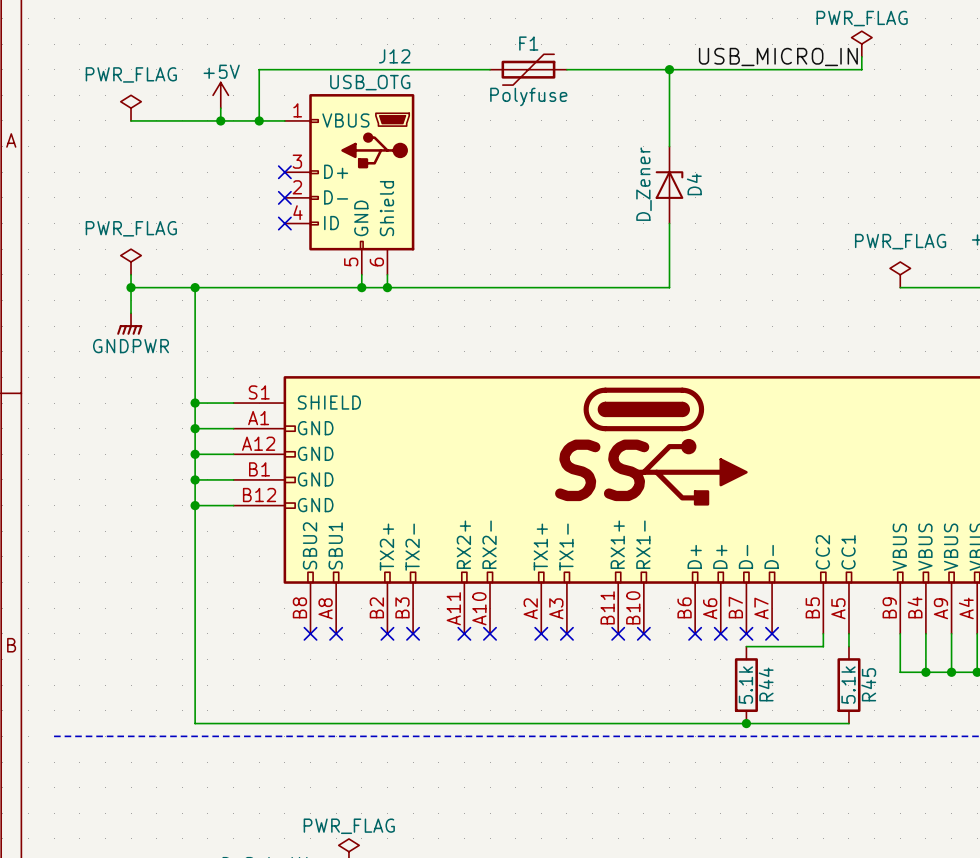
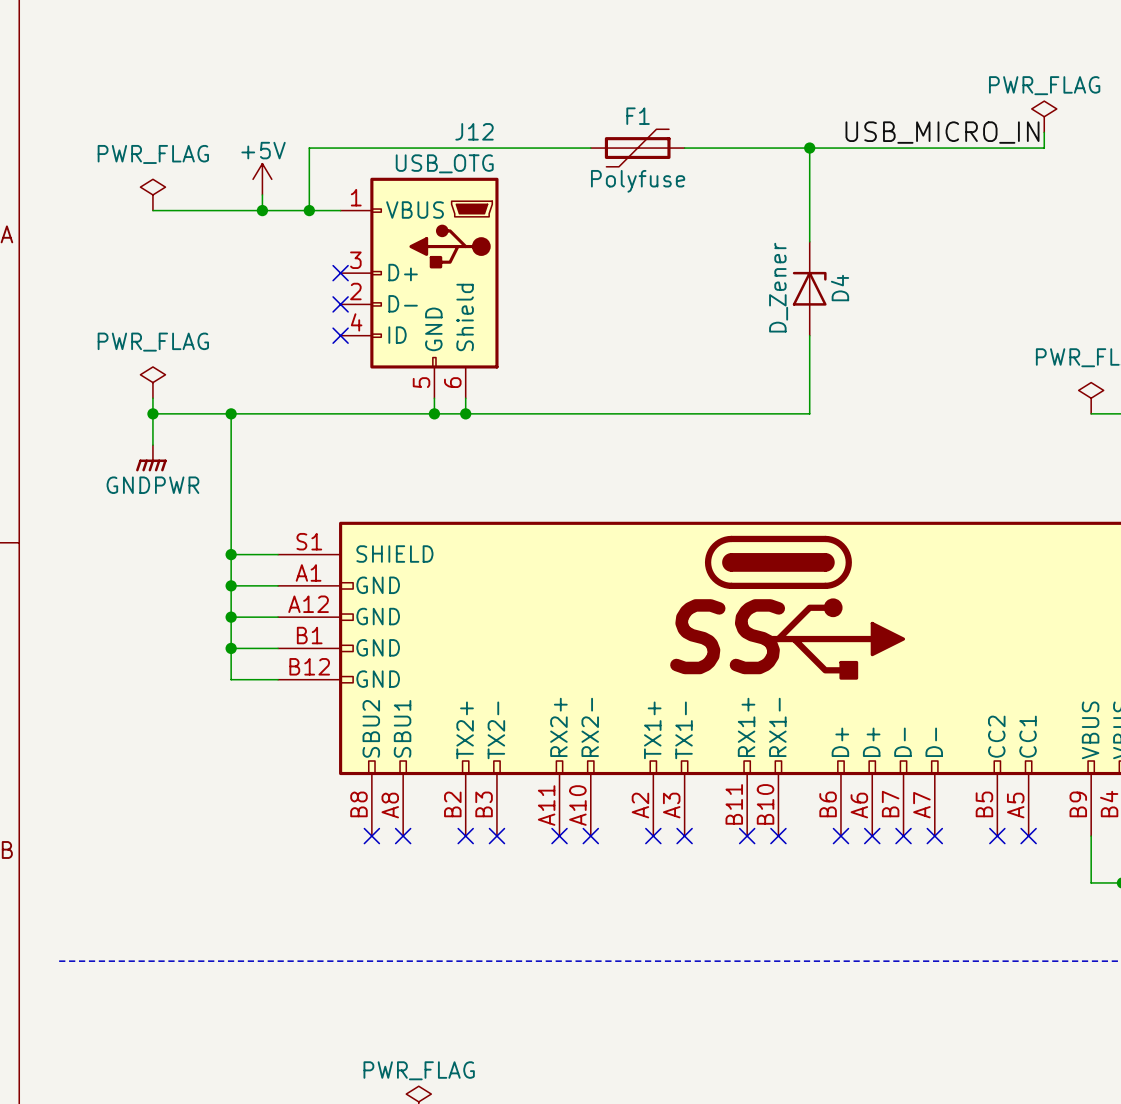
wire: (195, 505) (195, 723) (848, 723) -> none
junction: (195, 505) -> none
wire: (823, 633) (823, 646) (746, 646) -> none
no-connect mark: none -> (997, 836)
wire: (848, 633) (848, 646) -> none
no-connect mark: none -> (1028, 836)
R44: 5.1k (746, 685) -> none
R45: 5.1k (848, 685) -> none
junction: (746, 723) -> none

